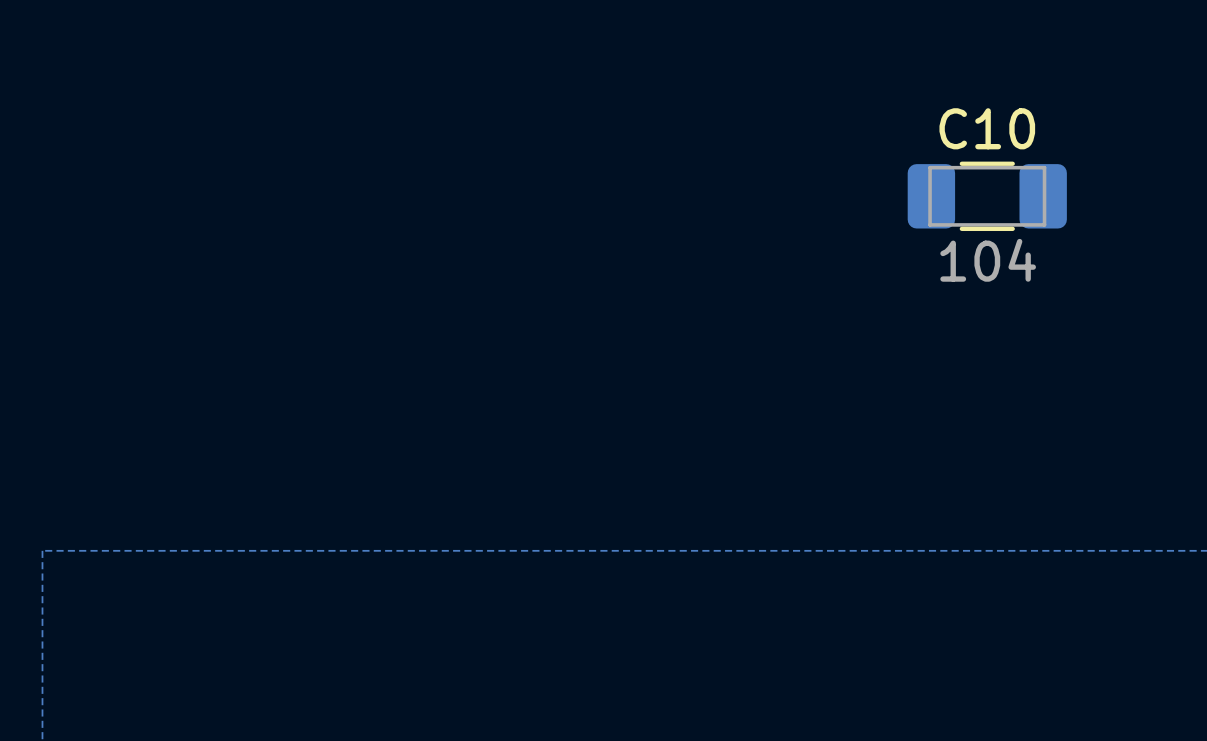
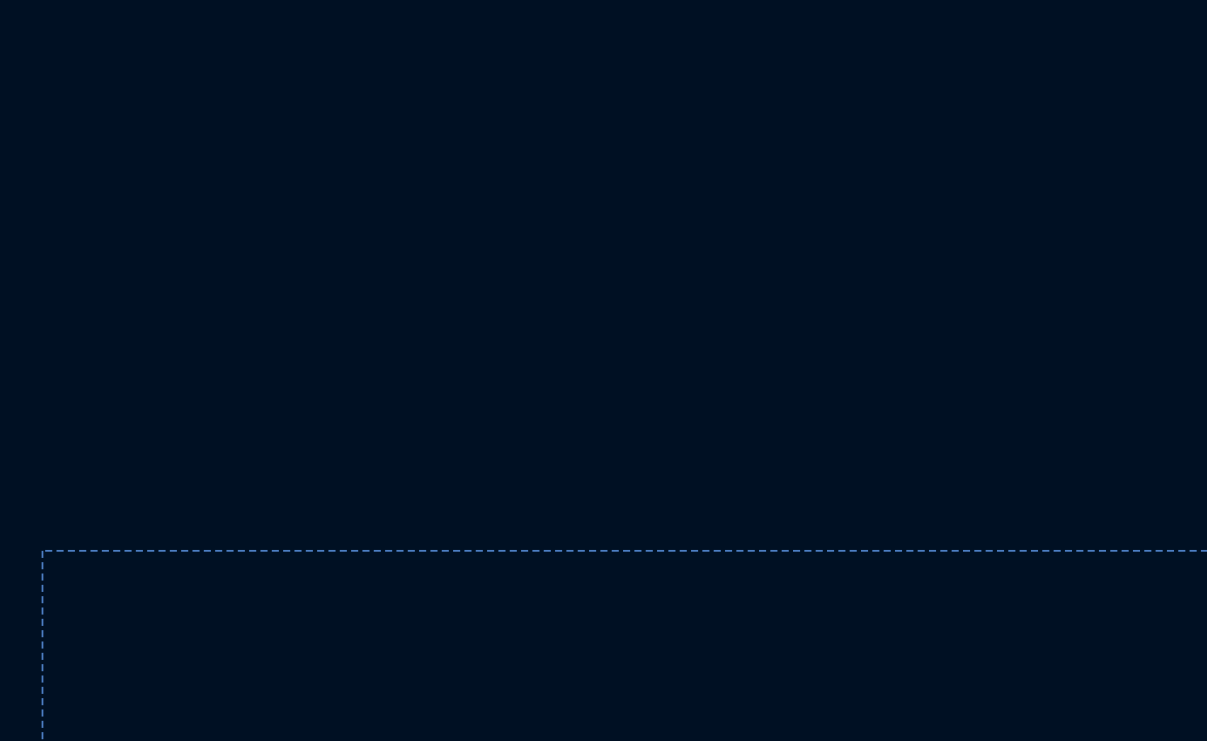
C10: 104 (987, 196) -> none

